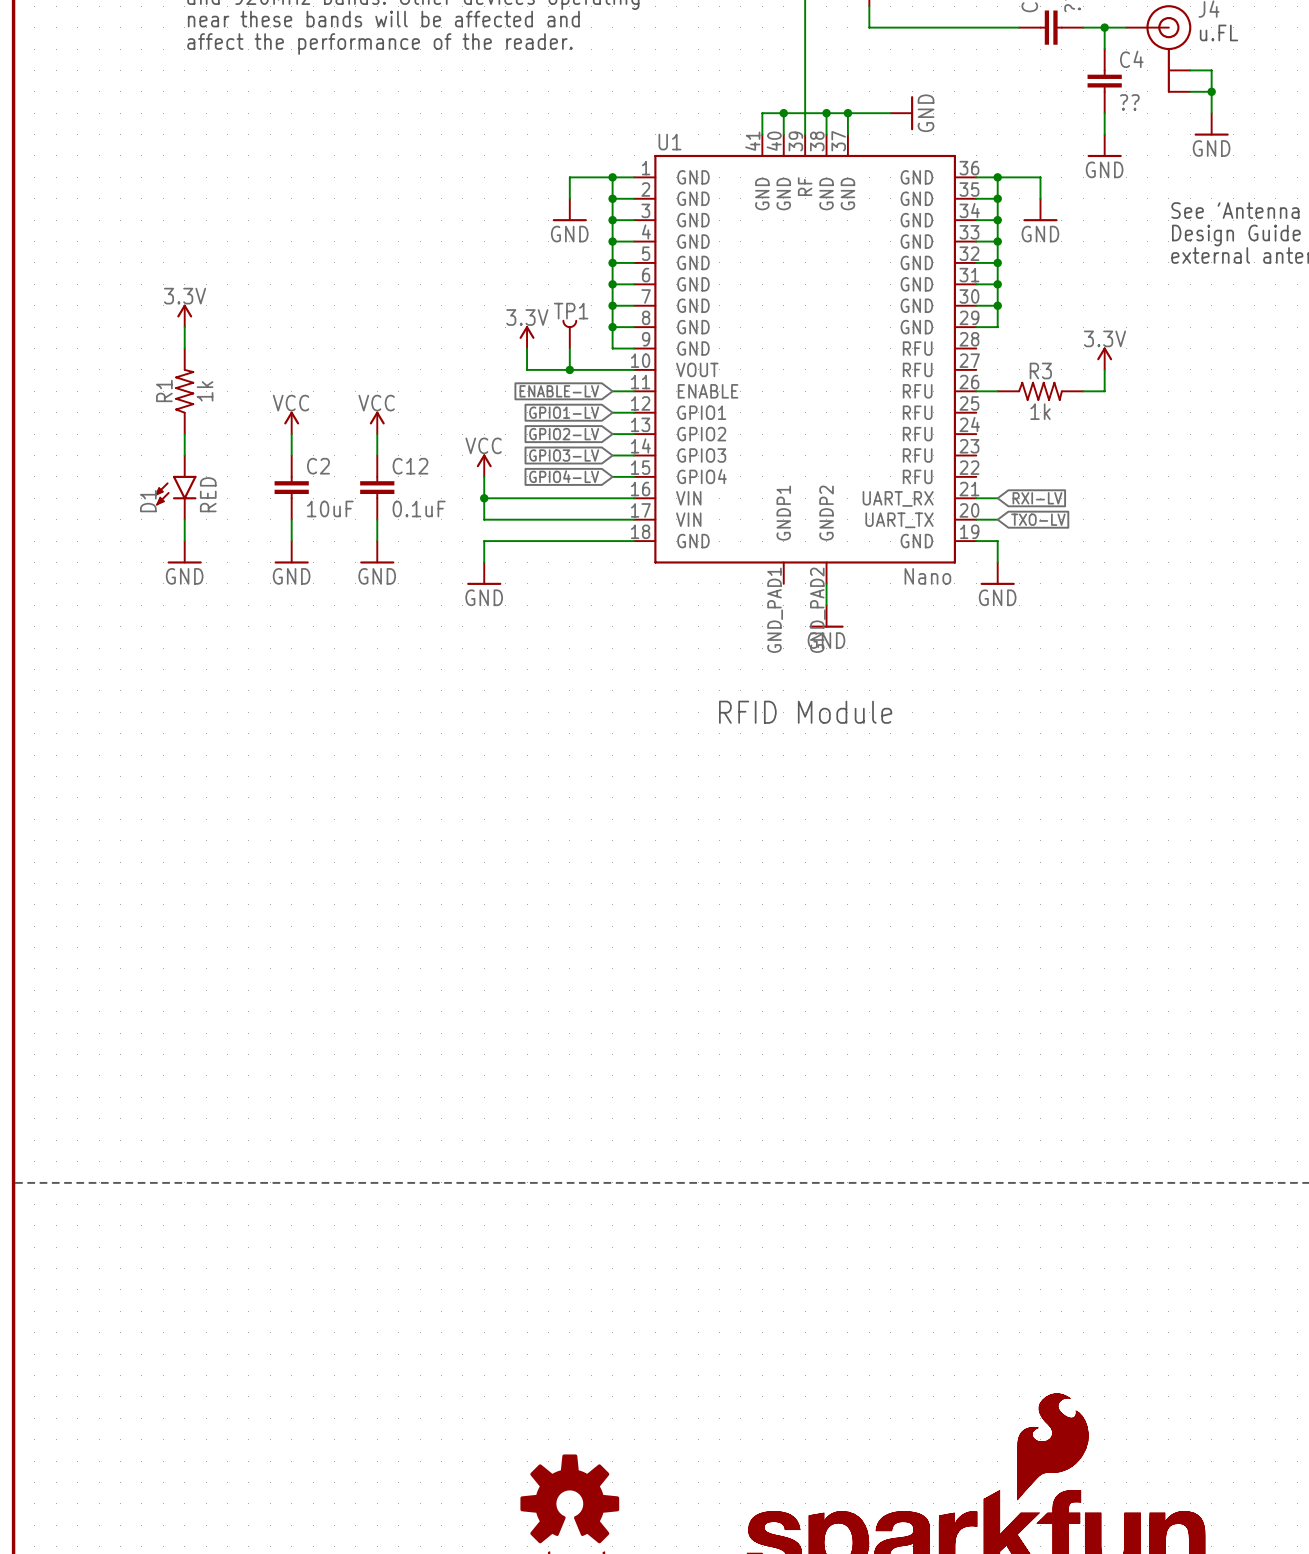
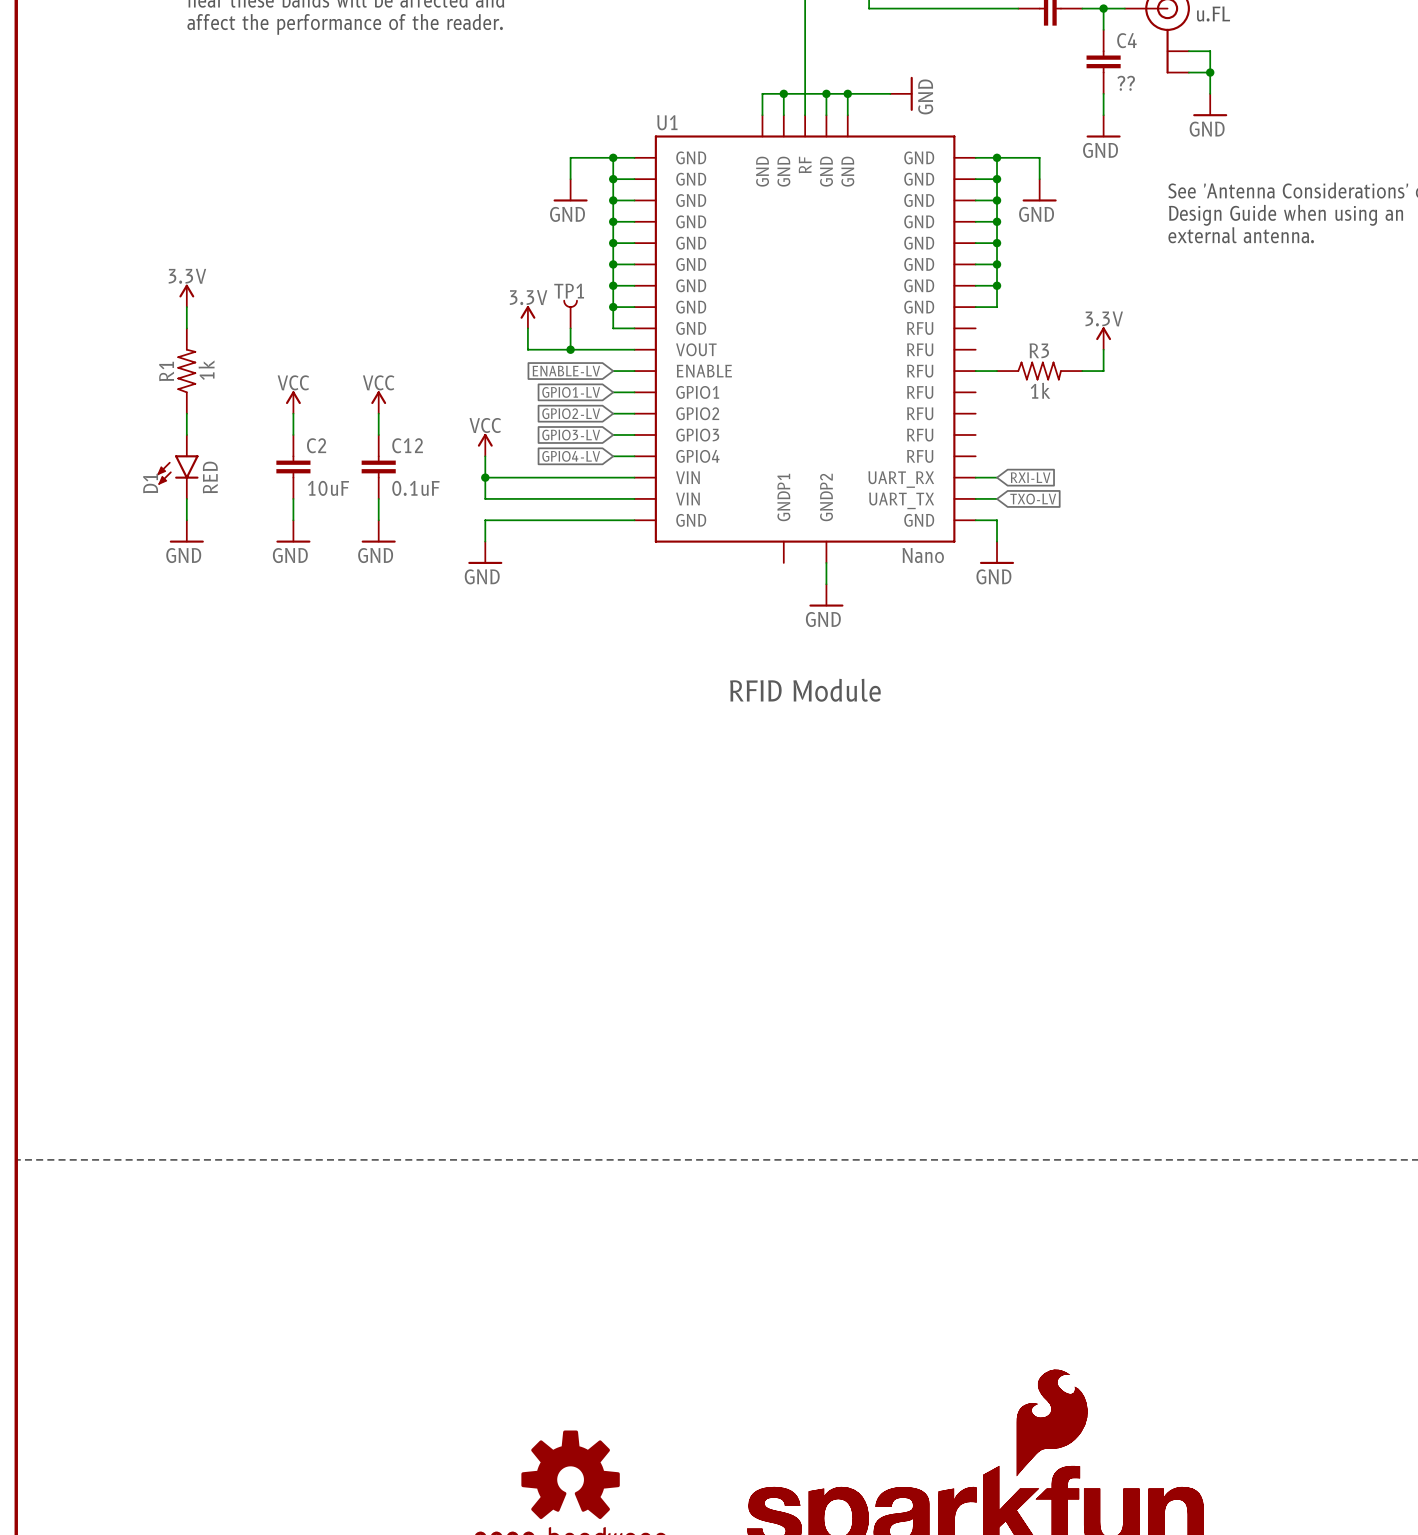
U1 symbol: [634, 134, 977, 584] -> [634, 115, 976, 563]

